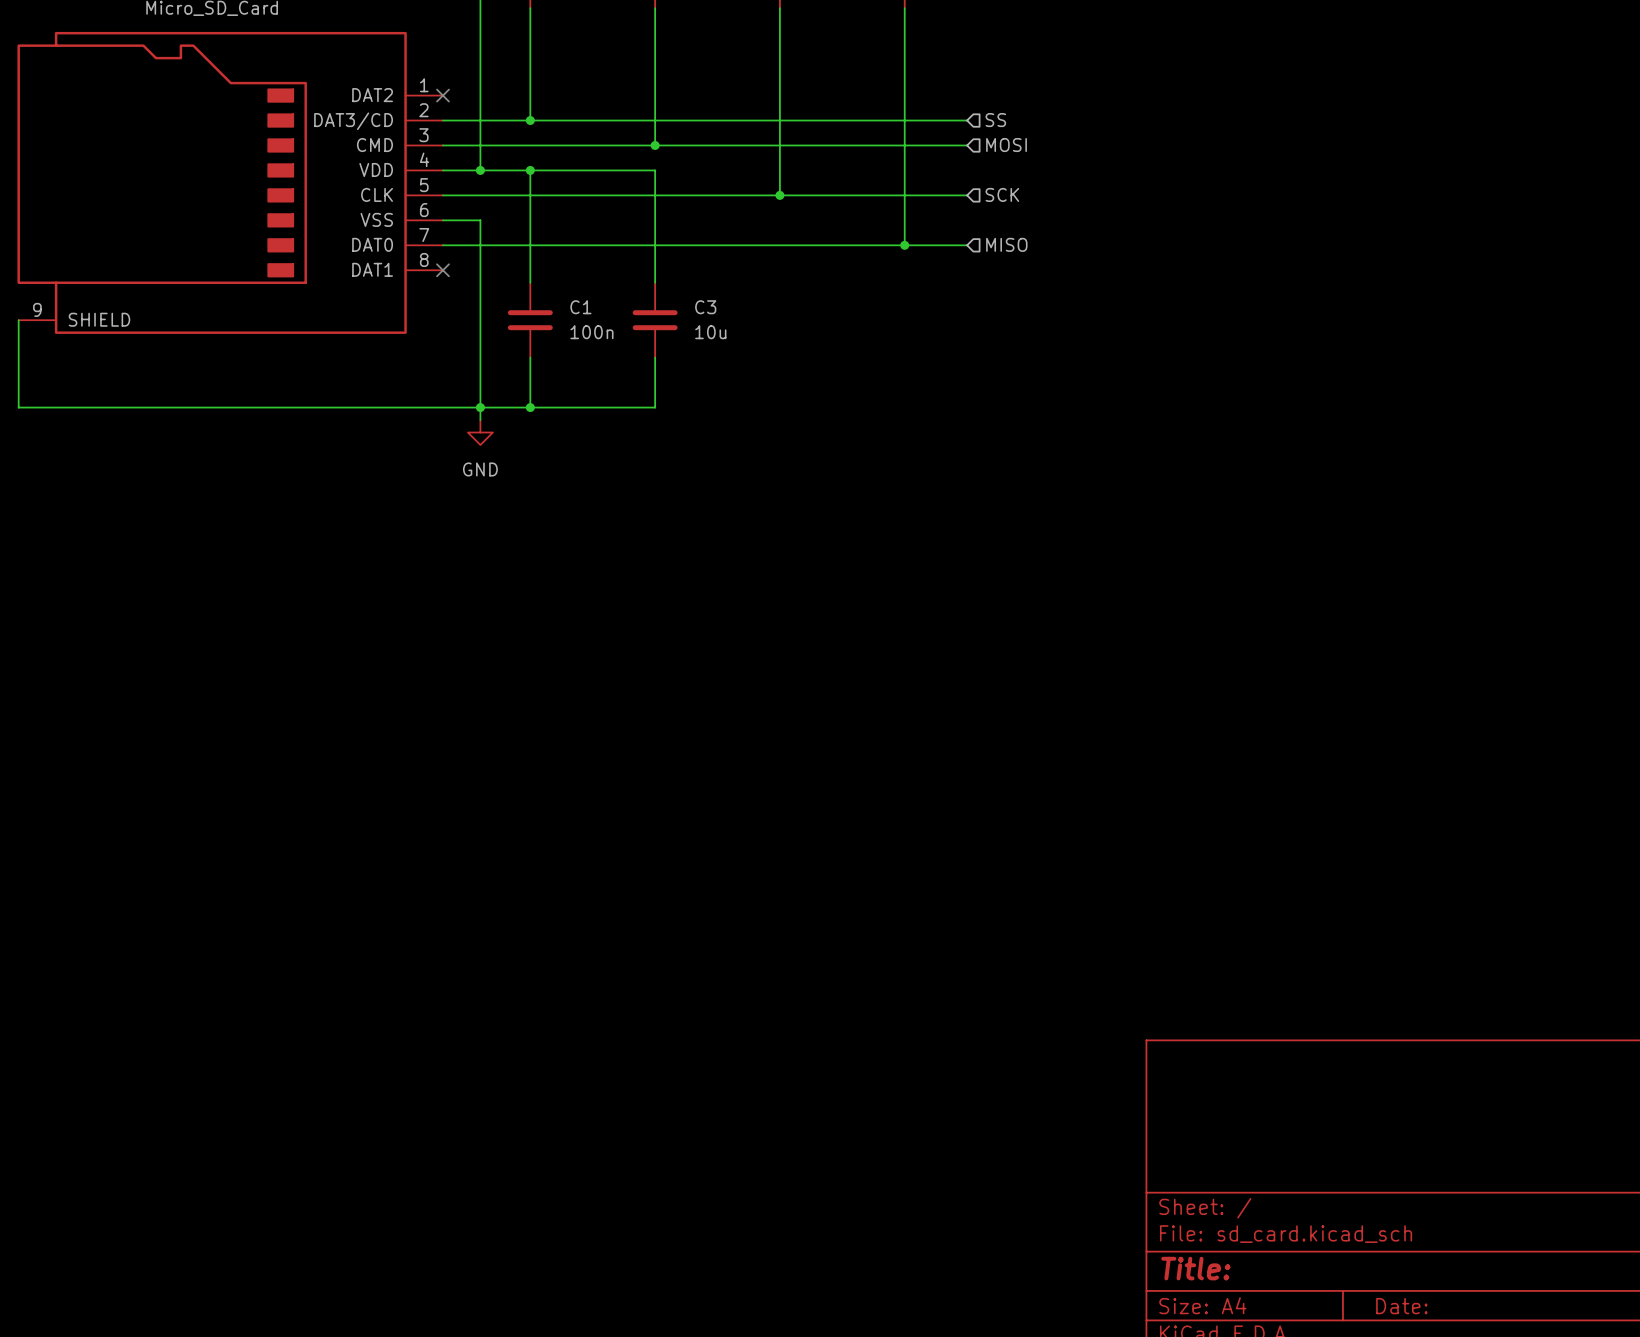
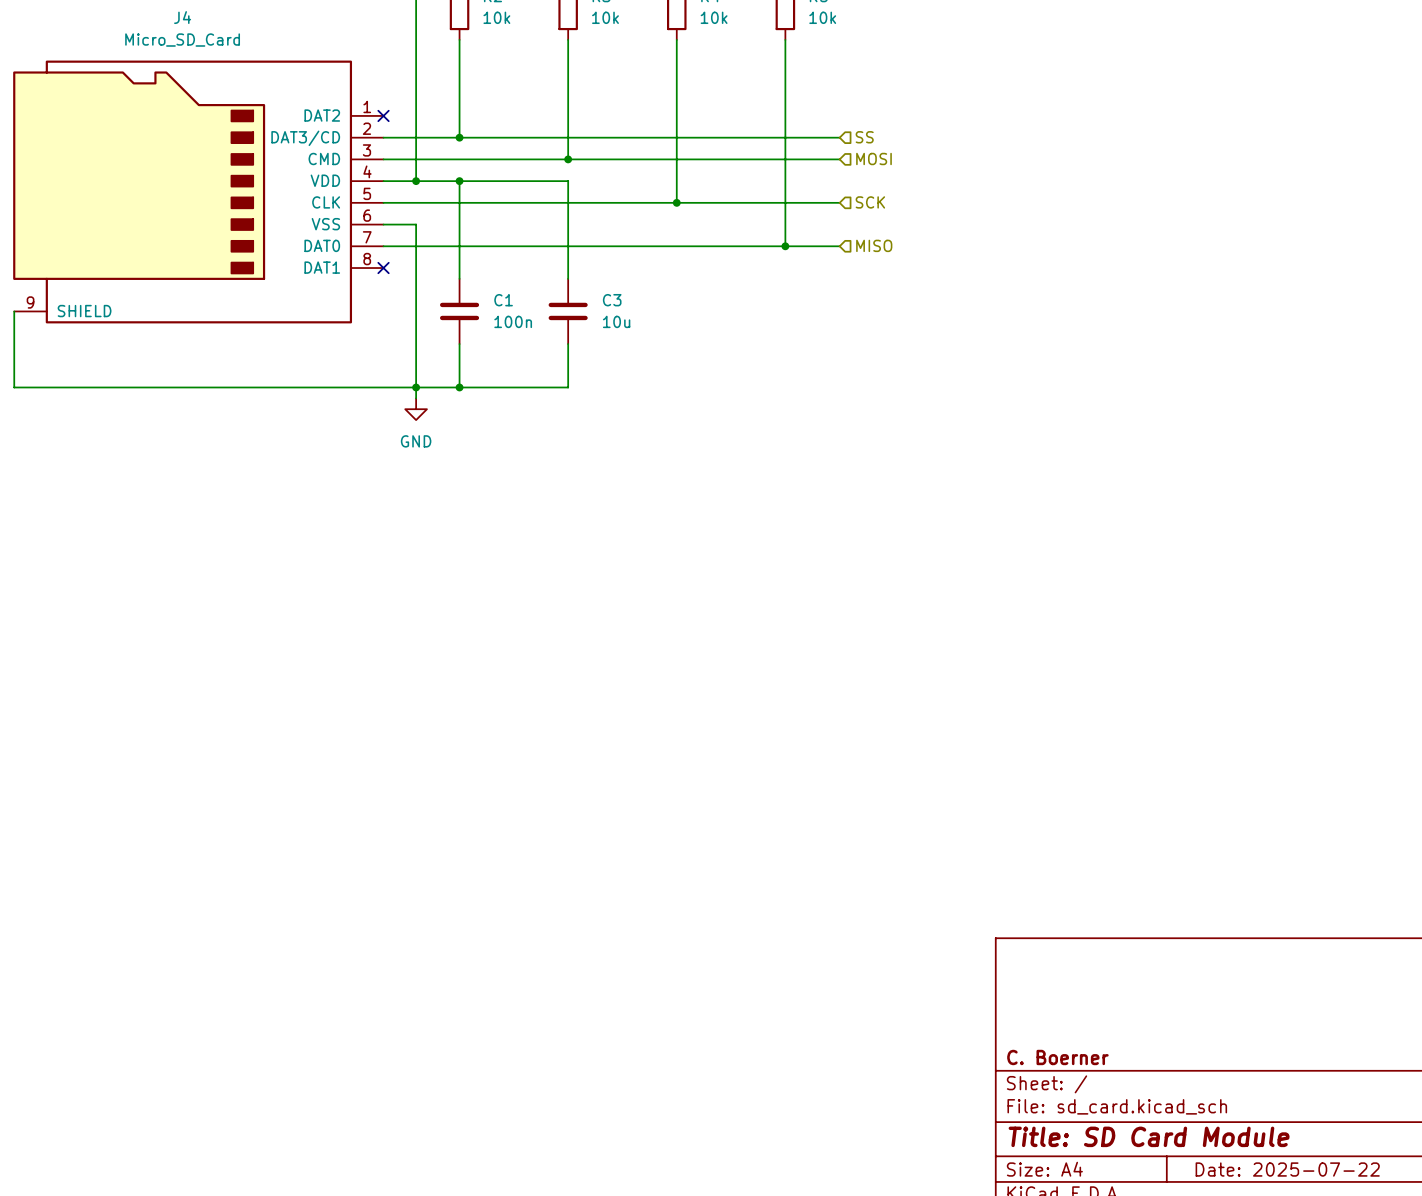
title block: none -> C. Boerner (1057, 1057)
title block: Title: (1195, 1268) -> Title: SD Card Module (1149, 1136)
title block: Date: (1401, 1306) -> Date: 2025-07-22 (1287, 1169)

